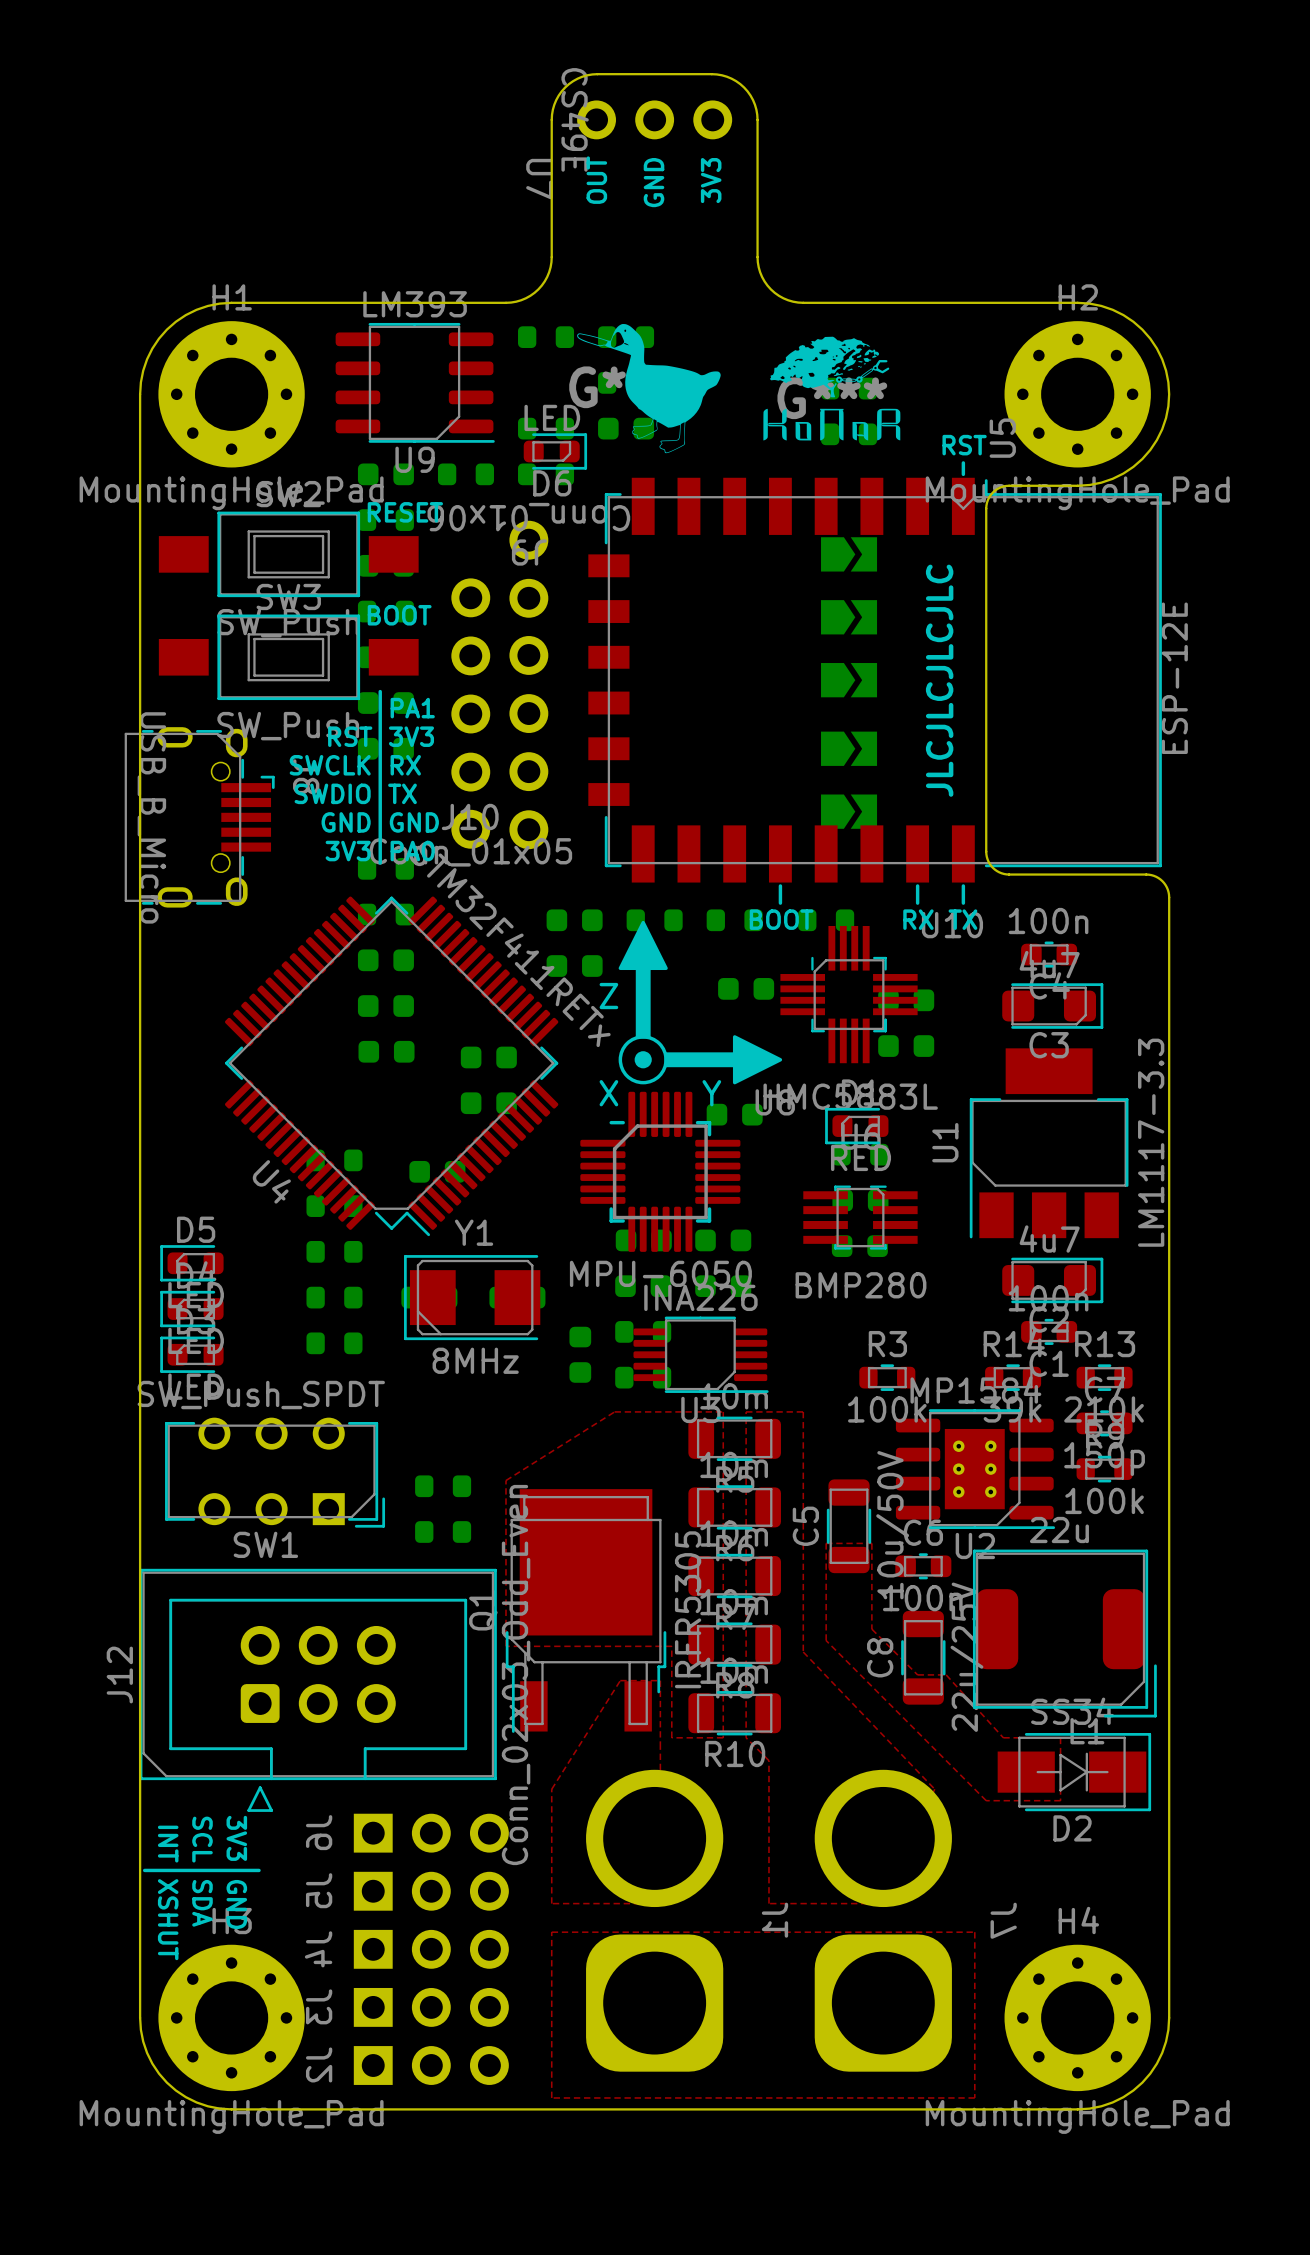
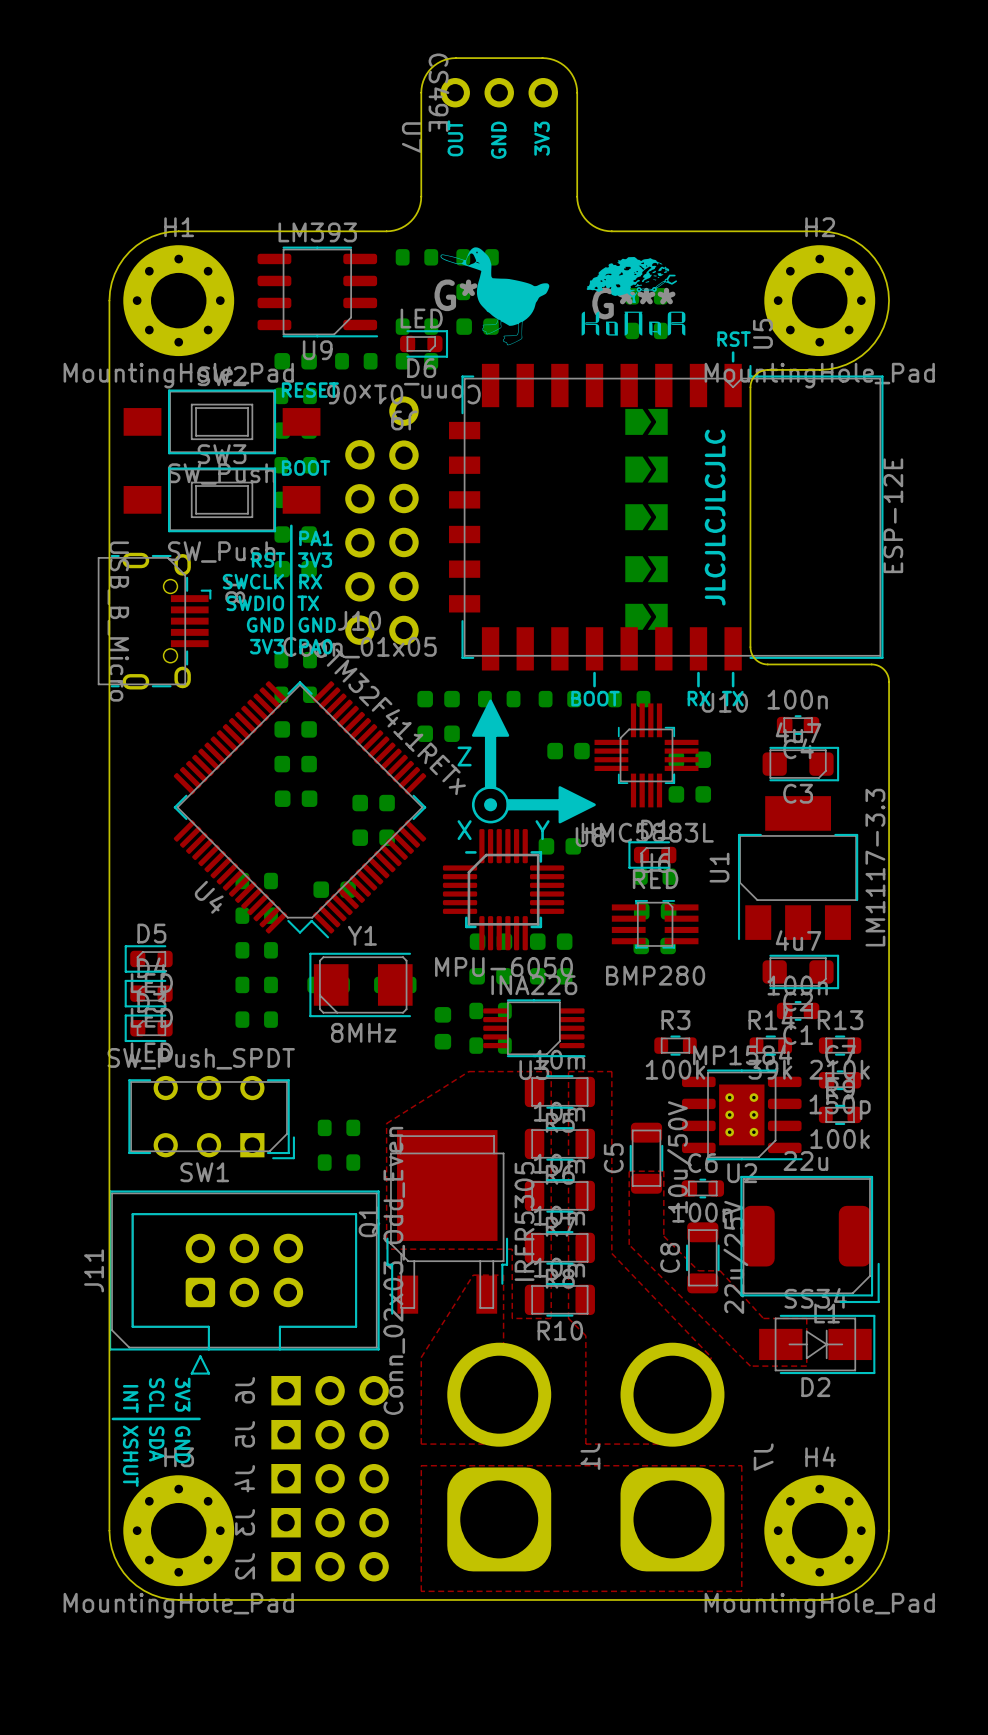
J12 name: J12 (119, 1675) -> J11 (94, 1270)

